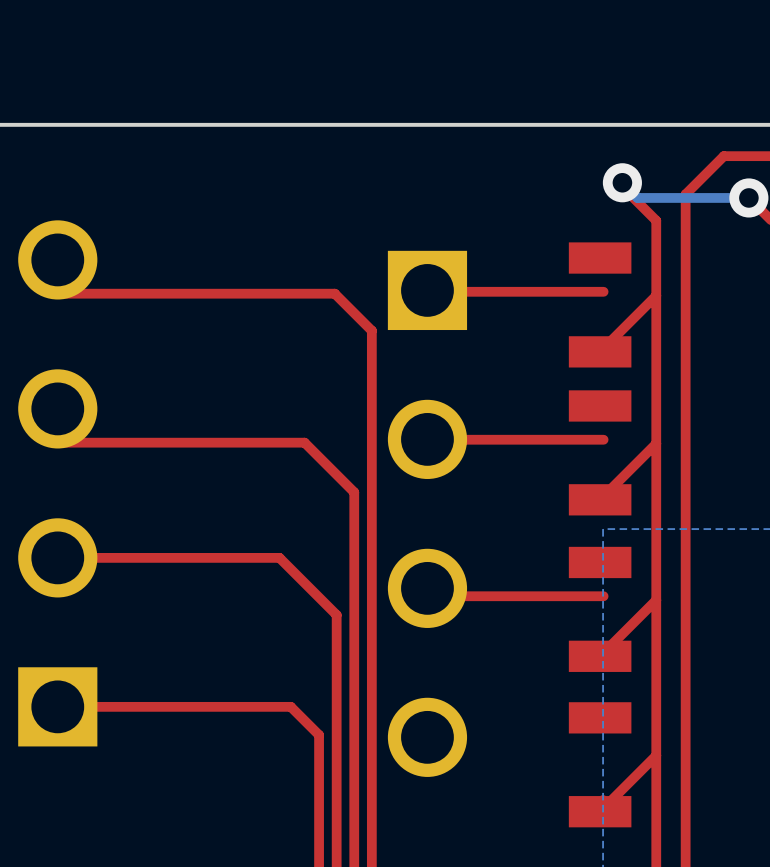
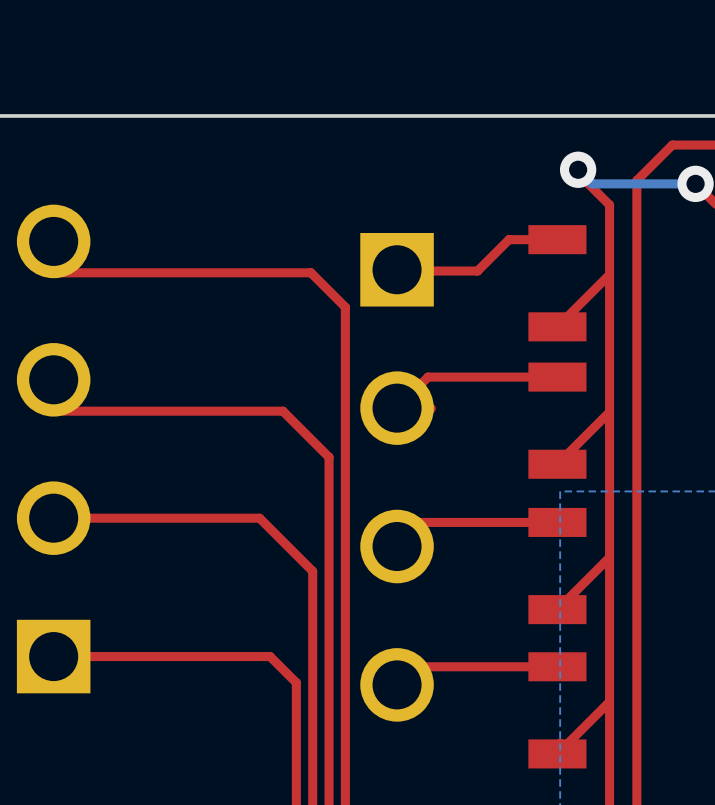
top track: (603, 291) (514, 291) -> (557, 239) (508, 239) (477, 271)
top track: none -> (557, 377) (428, 377) (397, 408)
top track: (603, 439) (464, 439) -> none
top track: none -> (557, 522) (421, 522) (397, 546)
top track: (603, 596) (456, 596) -> none
top track: none -> (557, 666) (415, 666) (397, 684)

